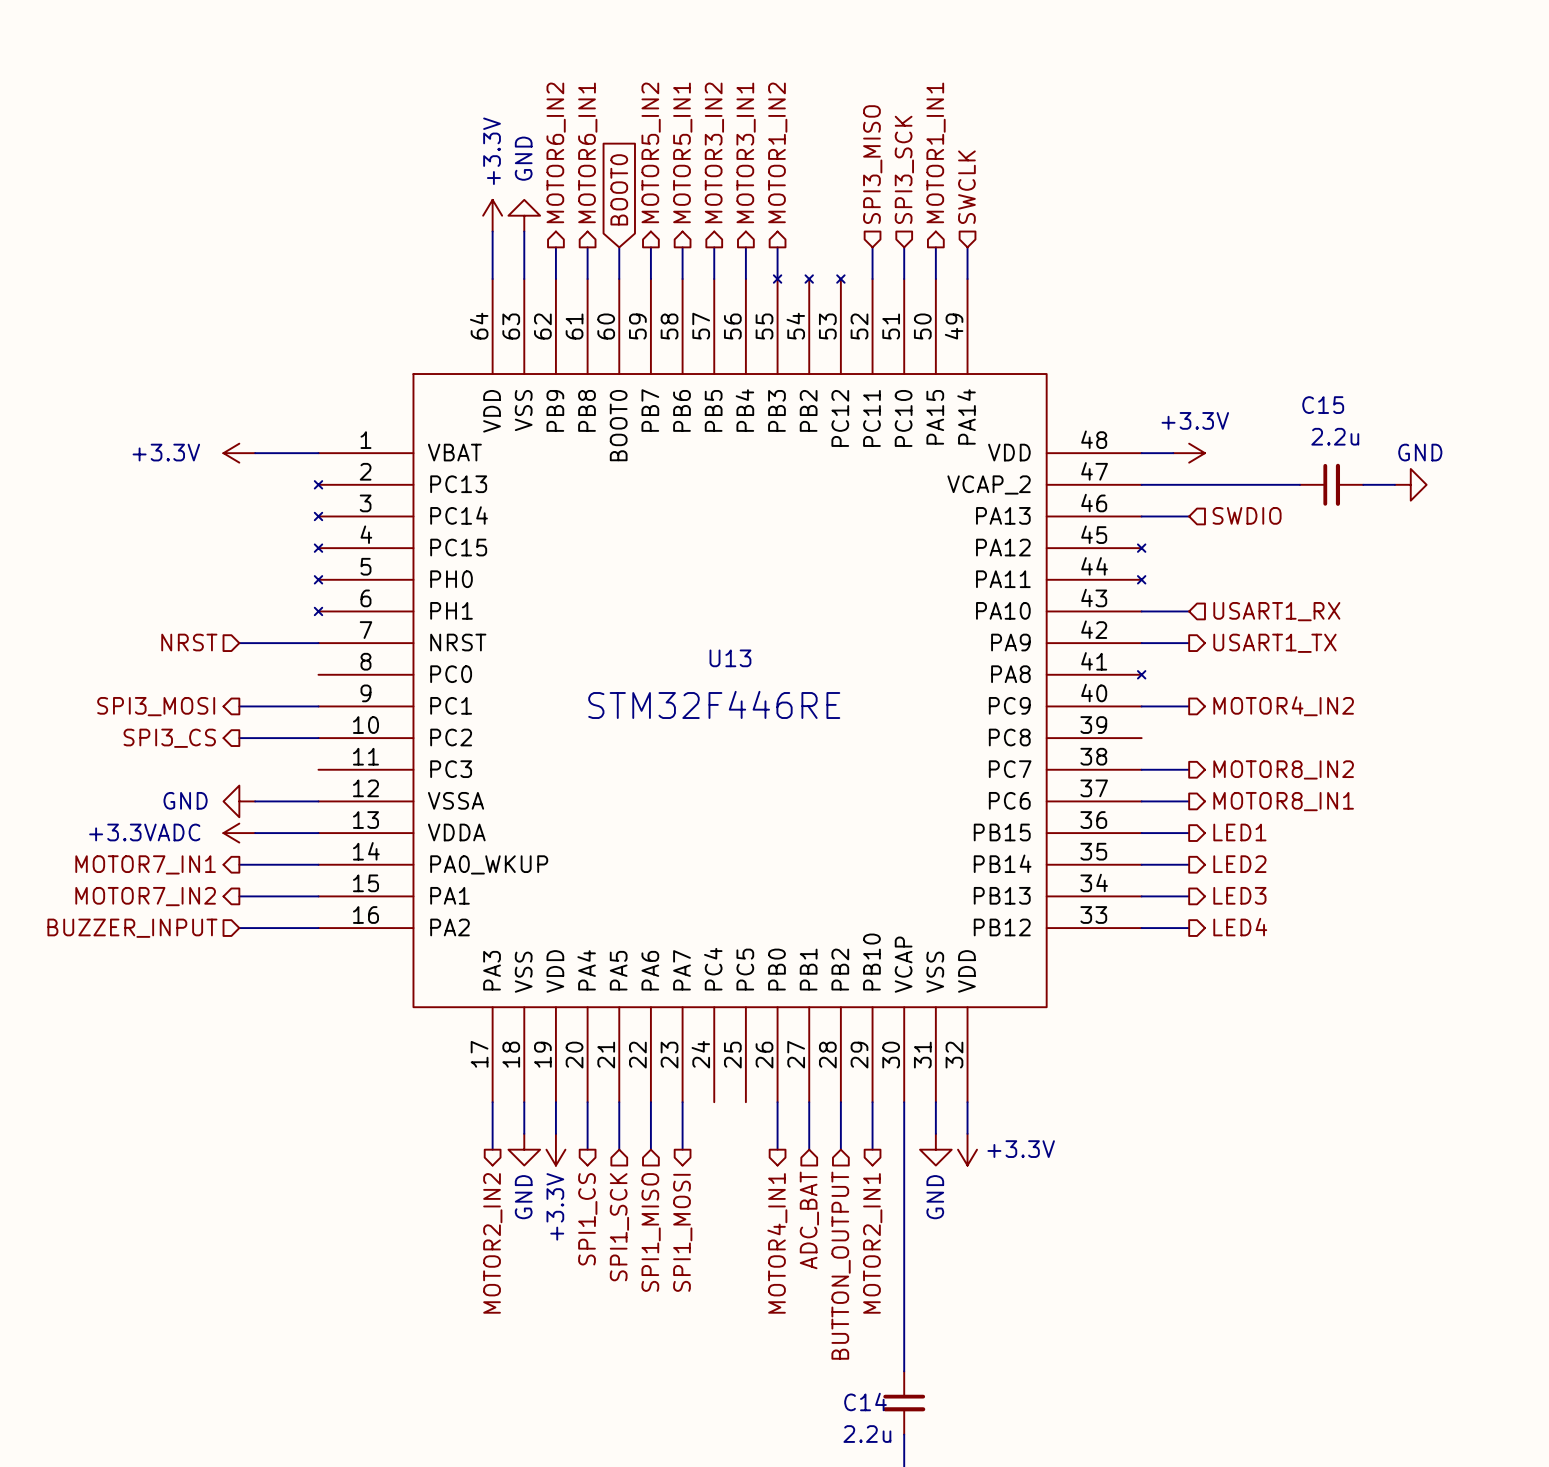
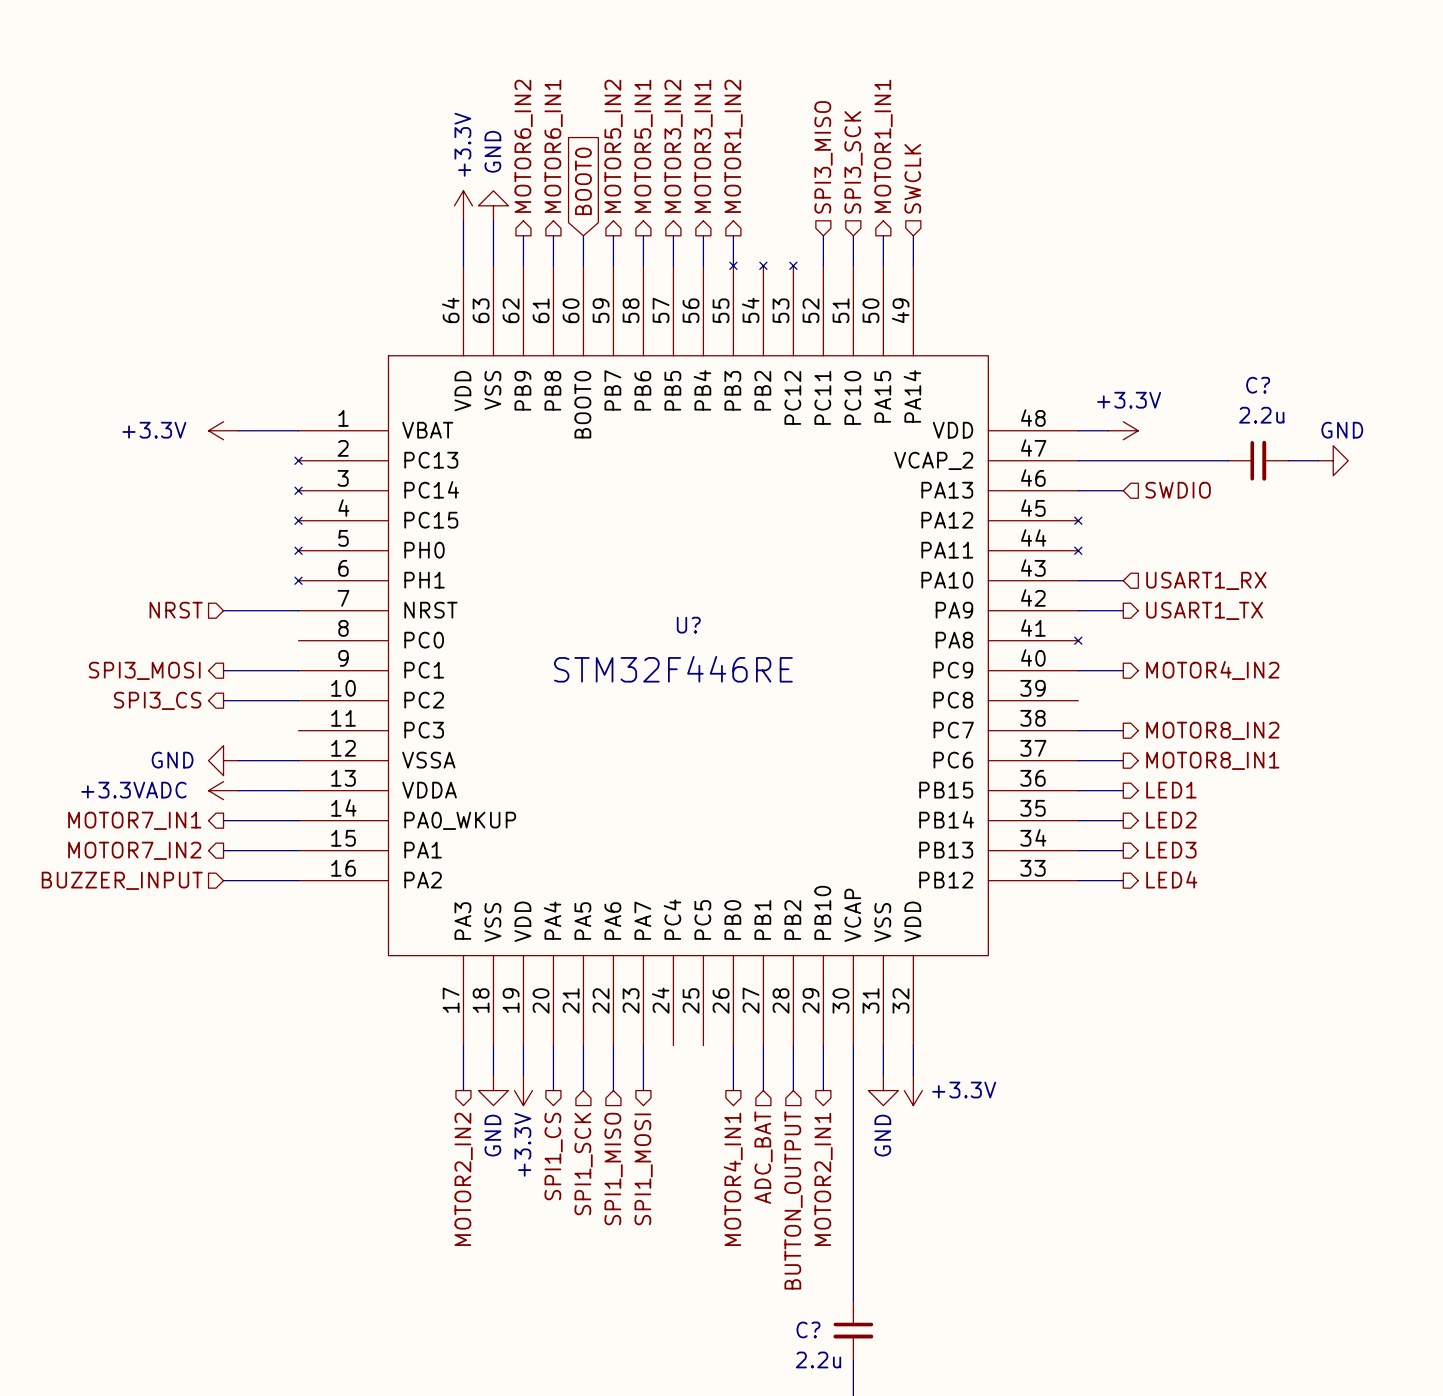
C15 name: C15 (1323, 405) -> C? (1258, 385)
U13 name: U13 (730, 658) -> U? (688, 625)
C14 name: C14 (865, 1402) -> C? (808, 1329)

